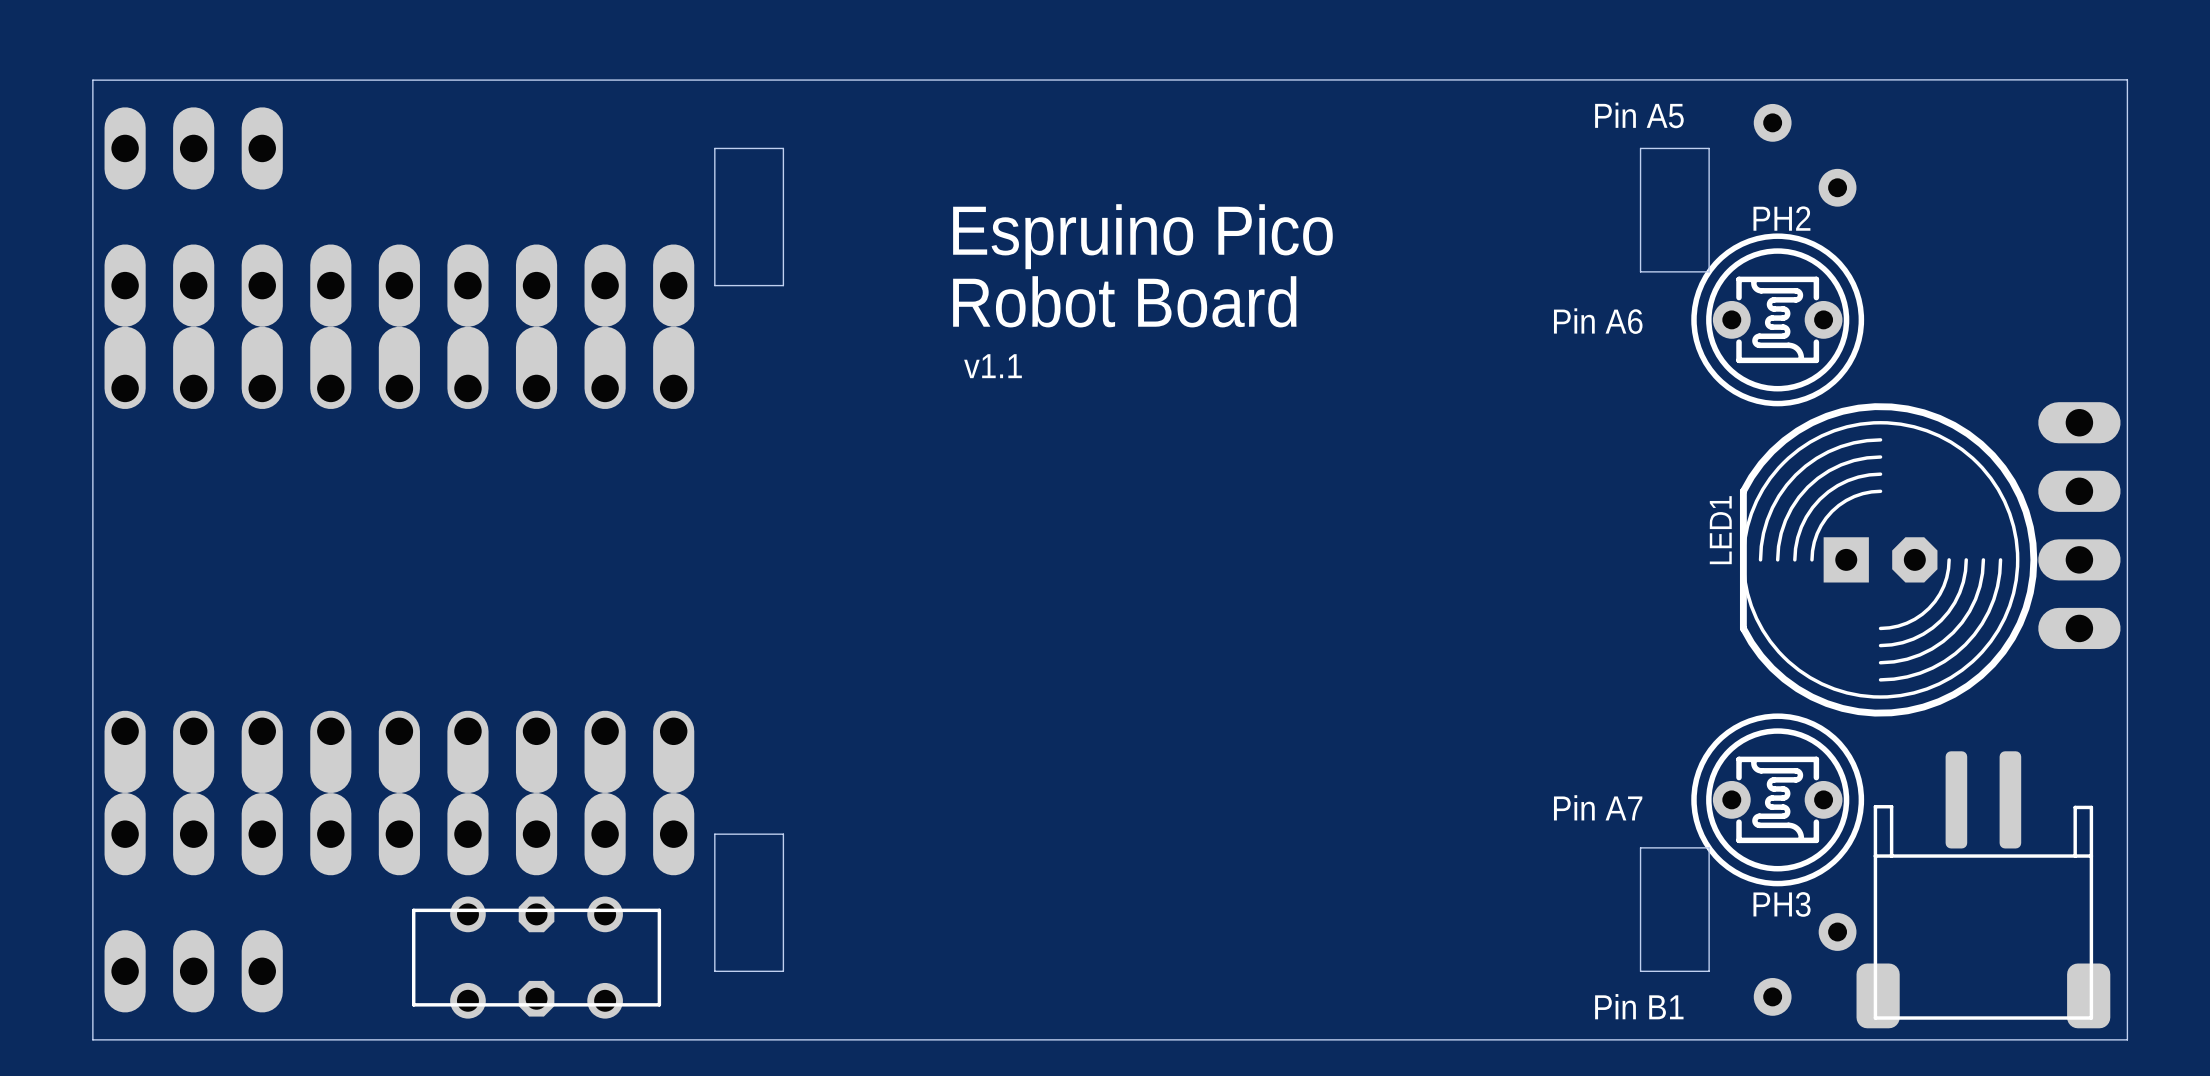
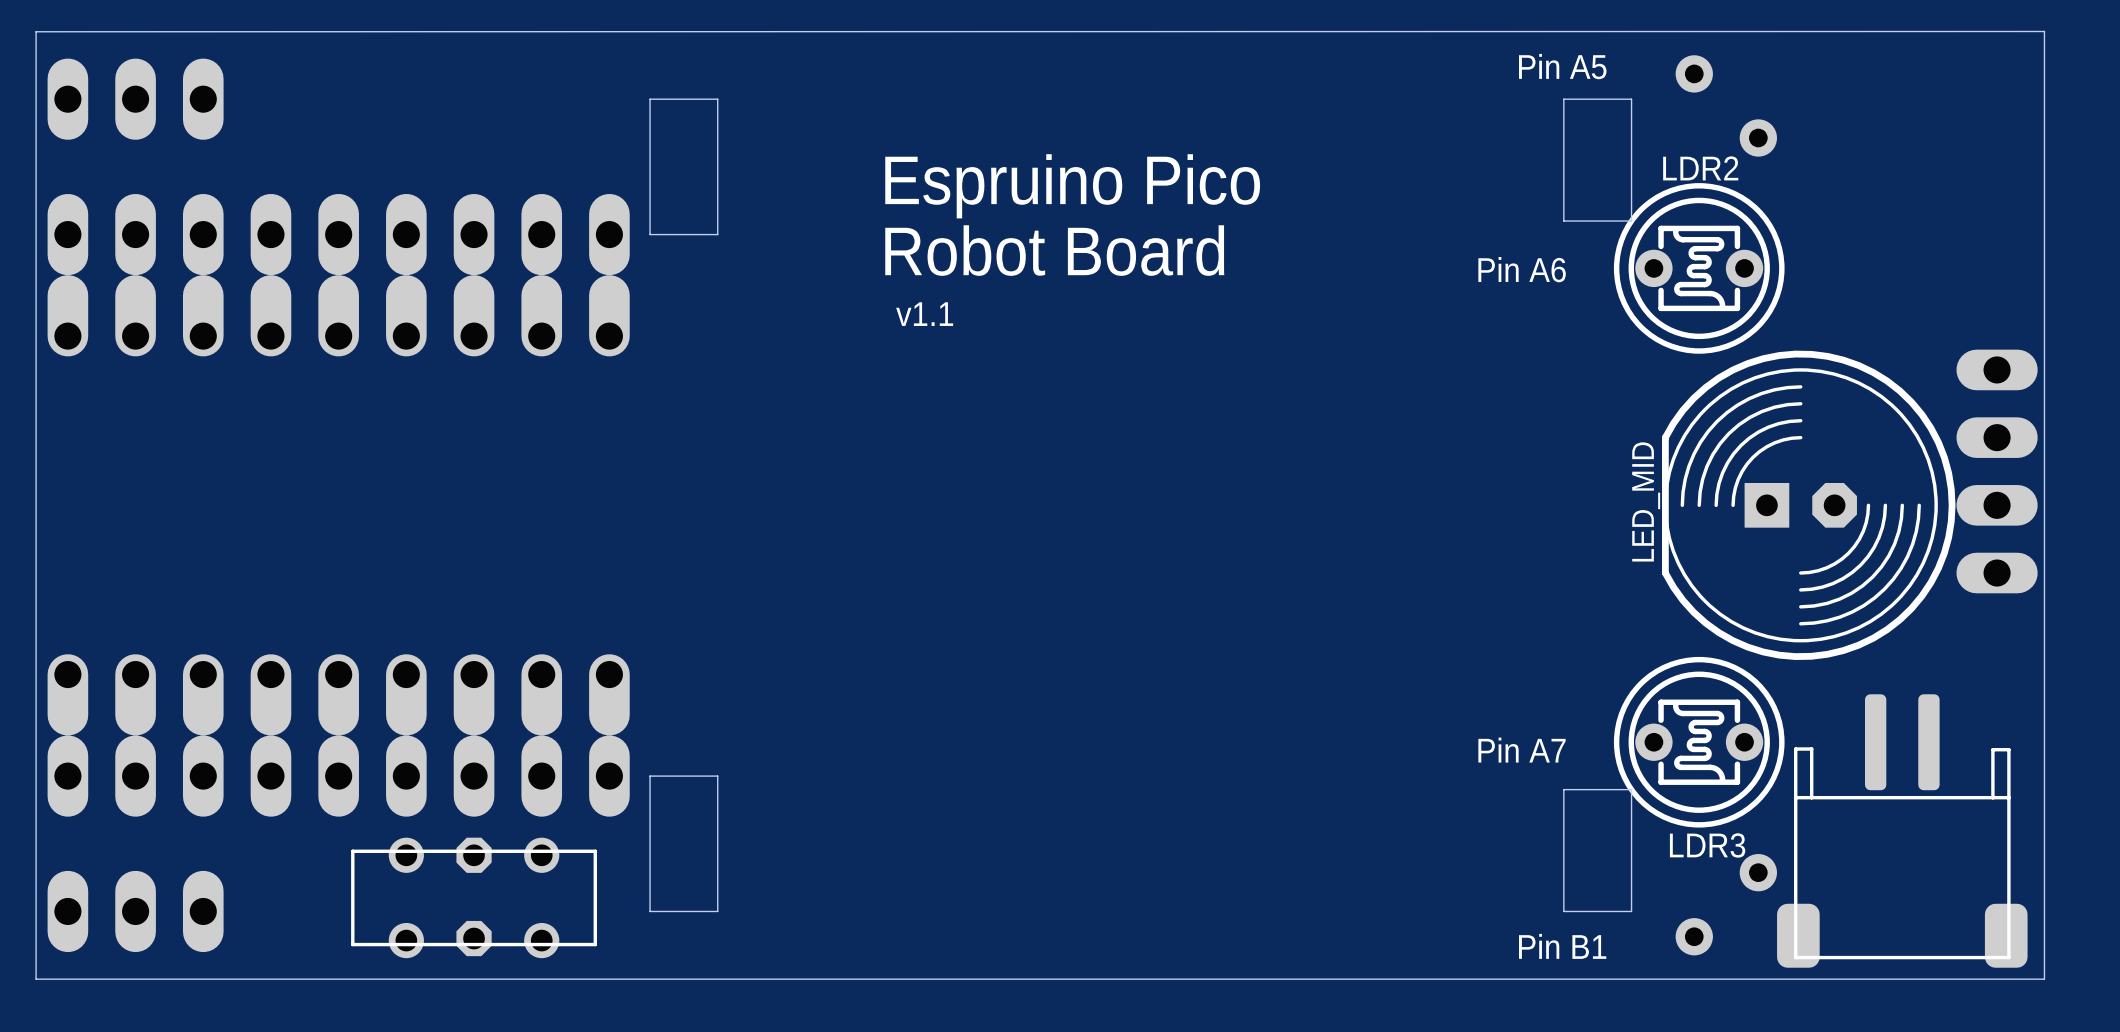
PH2 name: PH2 (1781, 218) -> LDR2 (1700, 168)
LED1 name: LED1 (1720, 530) -> LED_MID (1646, 501)
PH3 name: PH3 (1782, 904) -> LDR3 (1707, 845)

